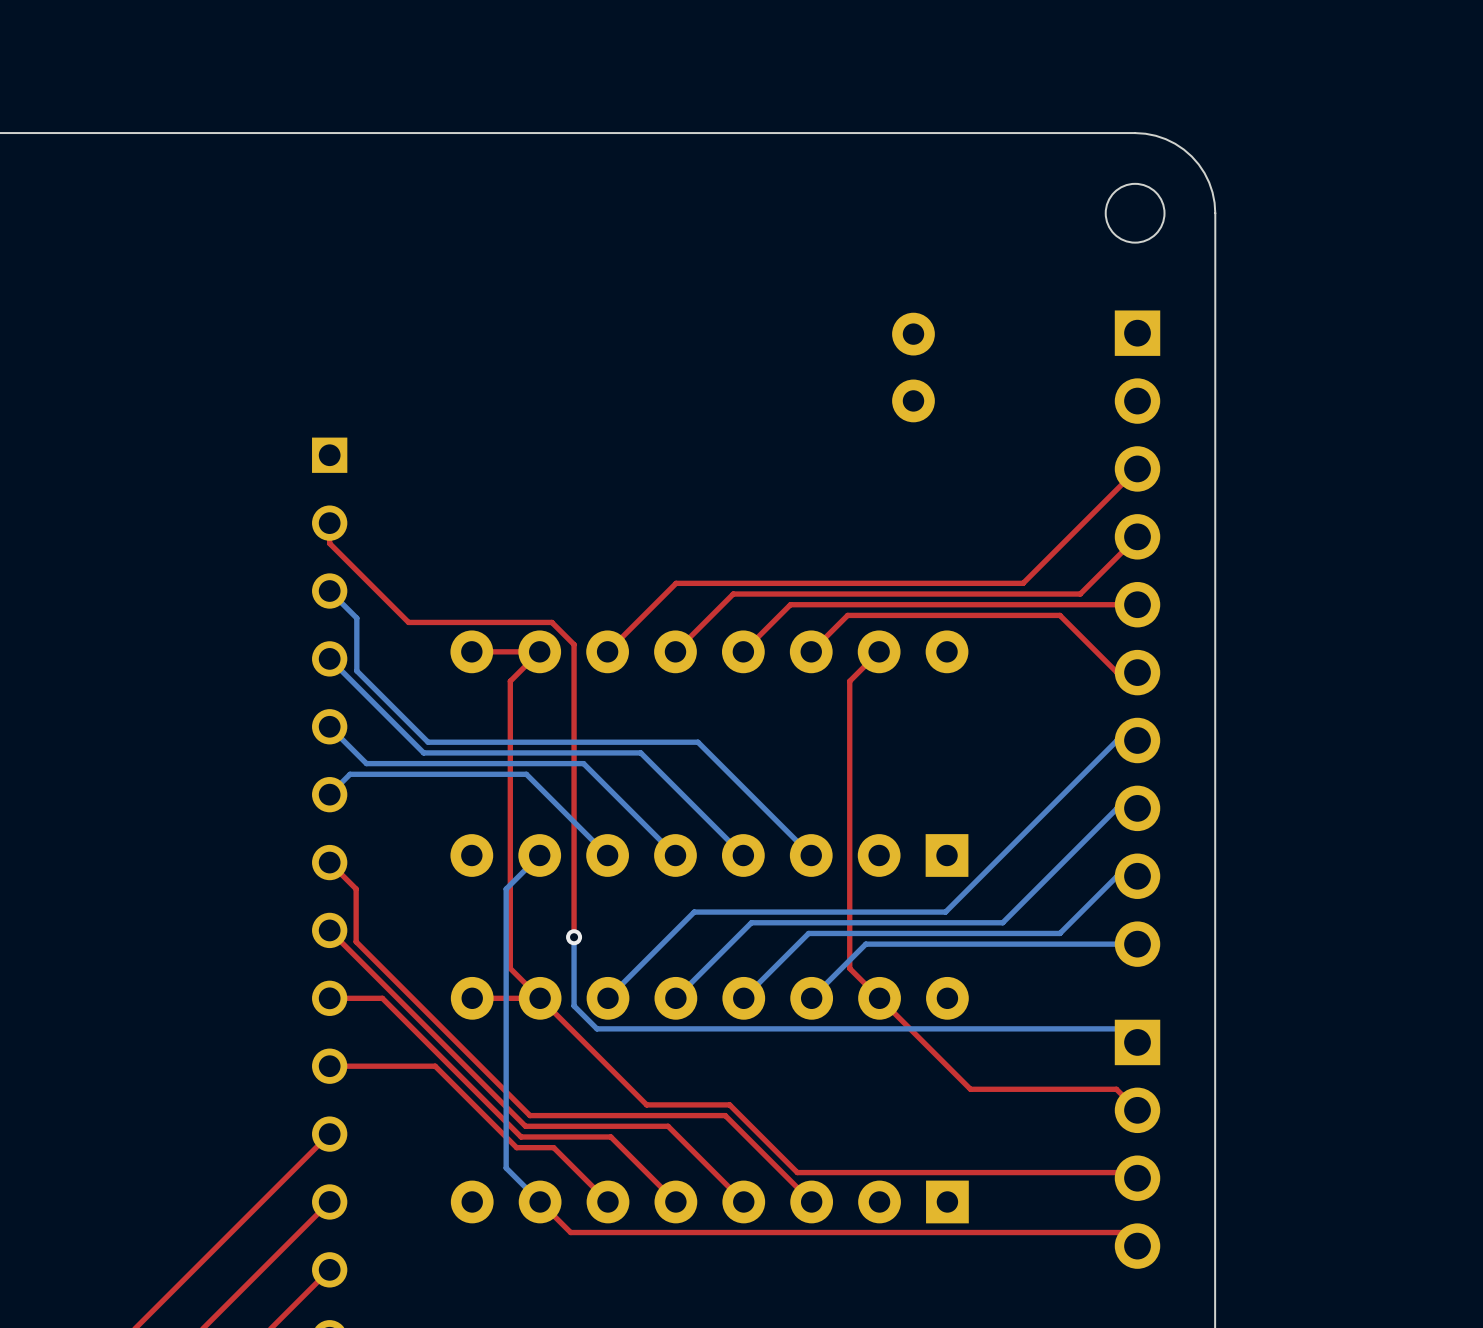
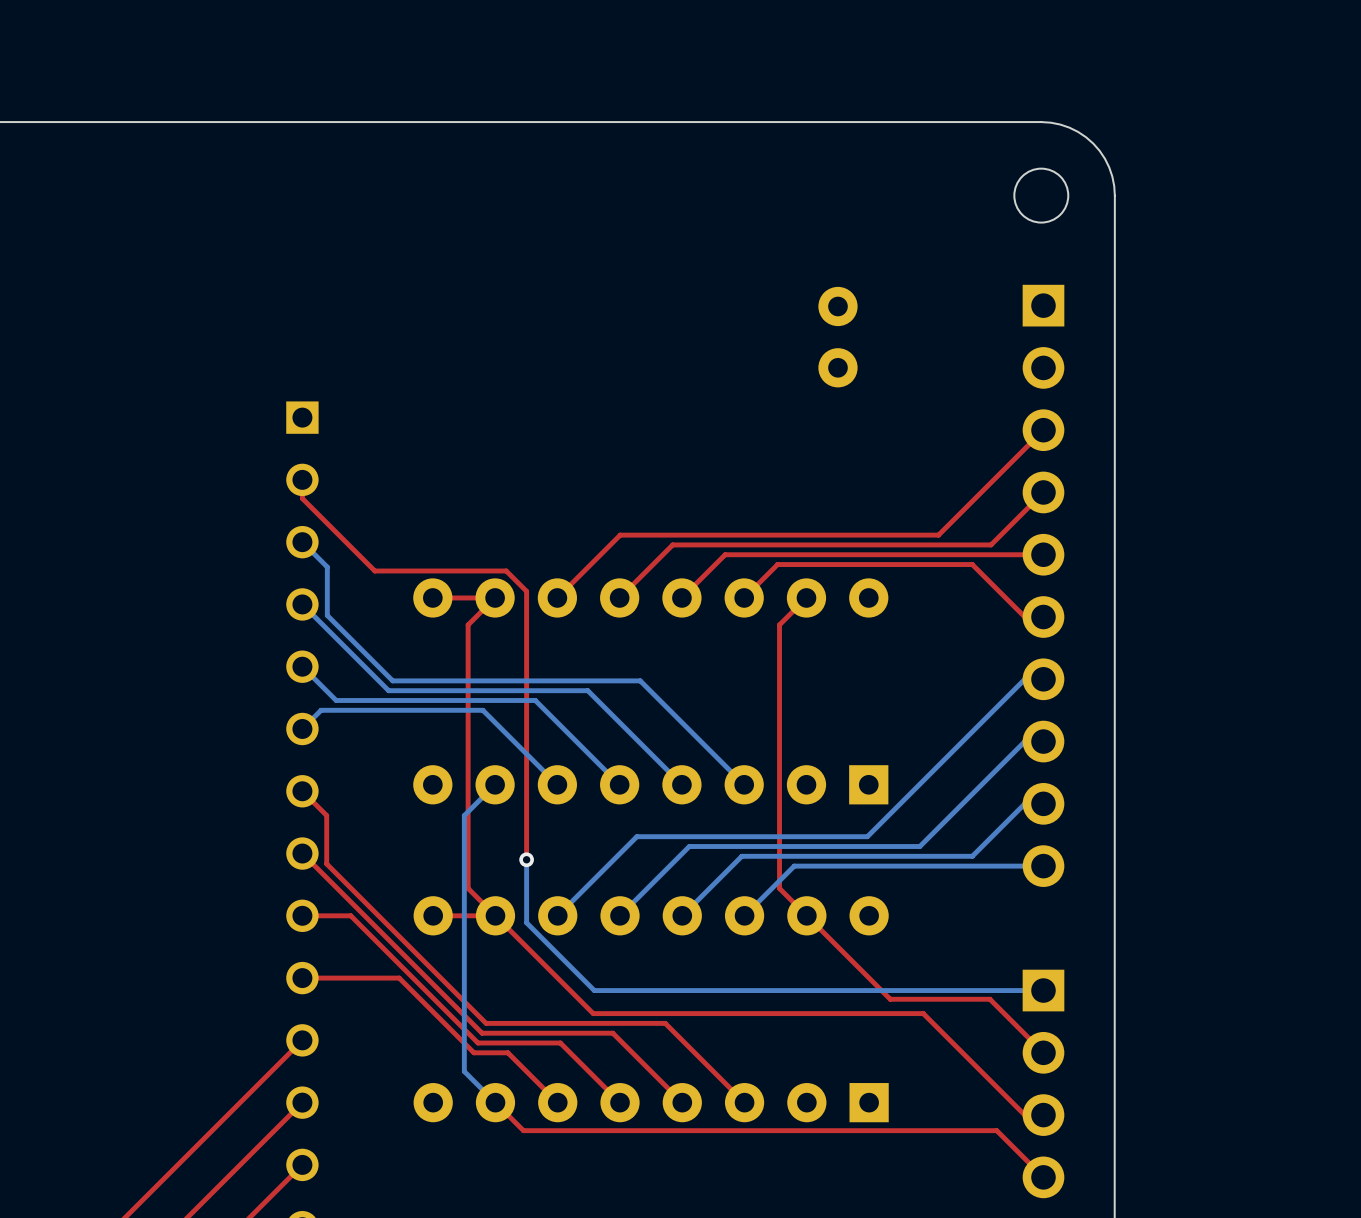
bottom track: (596, 1028) (1123, 1028) (1137, 1042) -> (547, 943) (594, 990) (1043, 990)
top track: (1079, 1089) (1116, 1089) (1137, 1110) -> (989, 999) (1043, 1052)
top track: (729, 1104) (797, 1172) (1131, 1172) (1137, 1178) -> (669, 1013) (923, 1013) (1024, 1115) (1043, 1115)
part position: (1137, 1144) -> (1043, 1083)
top track: (1086, 1232) (1123, 1232) (1137, 1246) -> (996, 1130) (1043, 1177)

